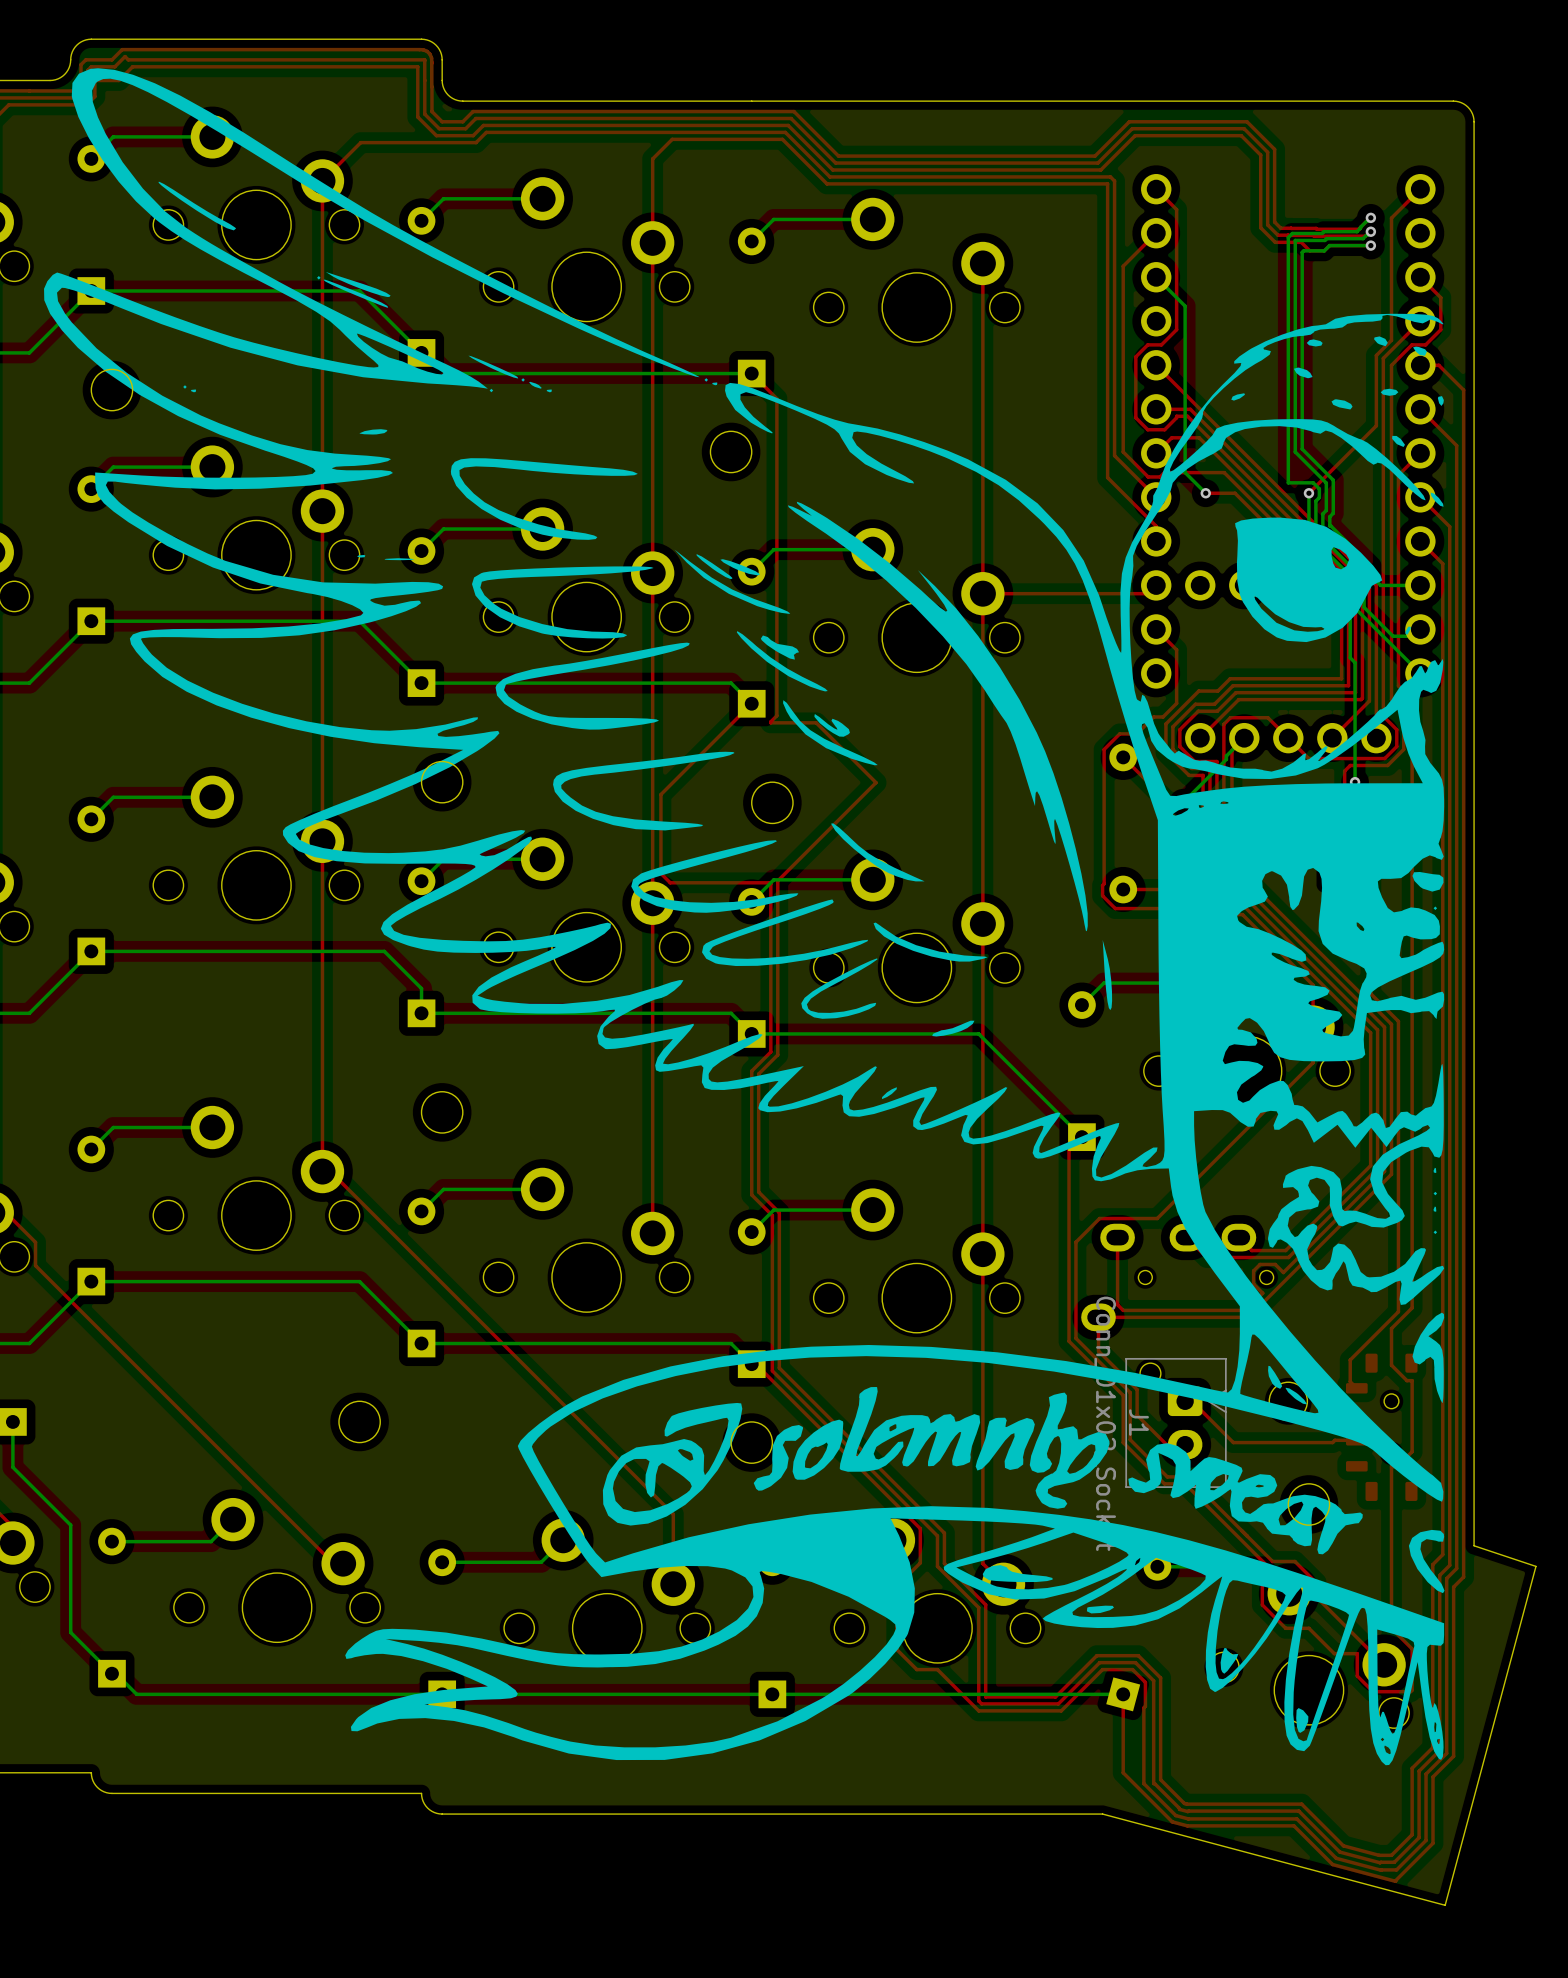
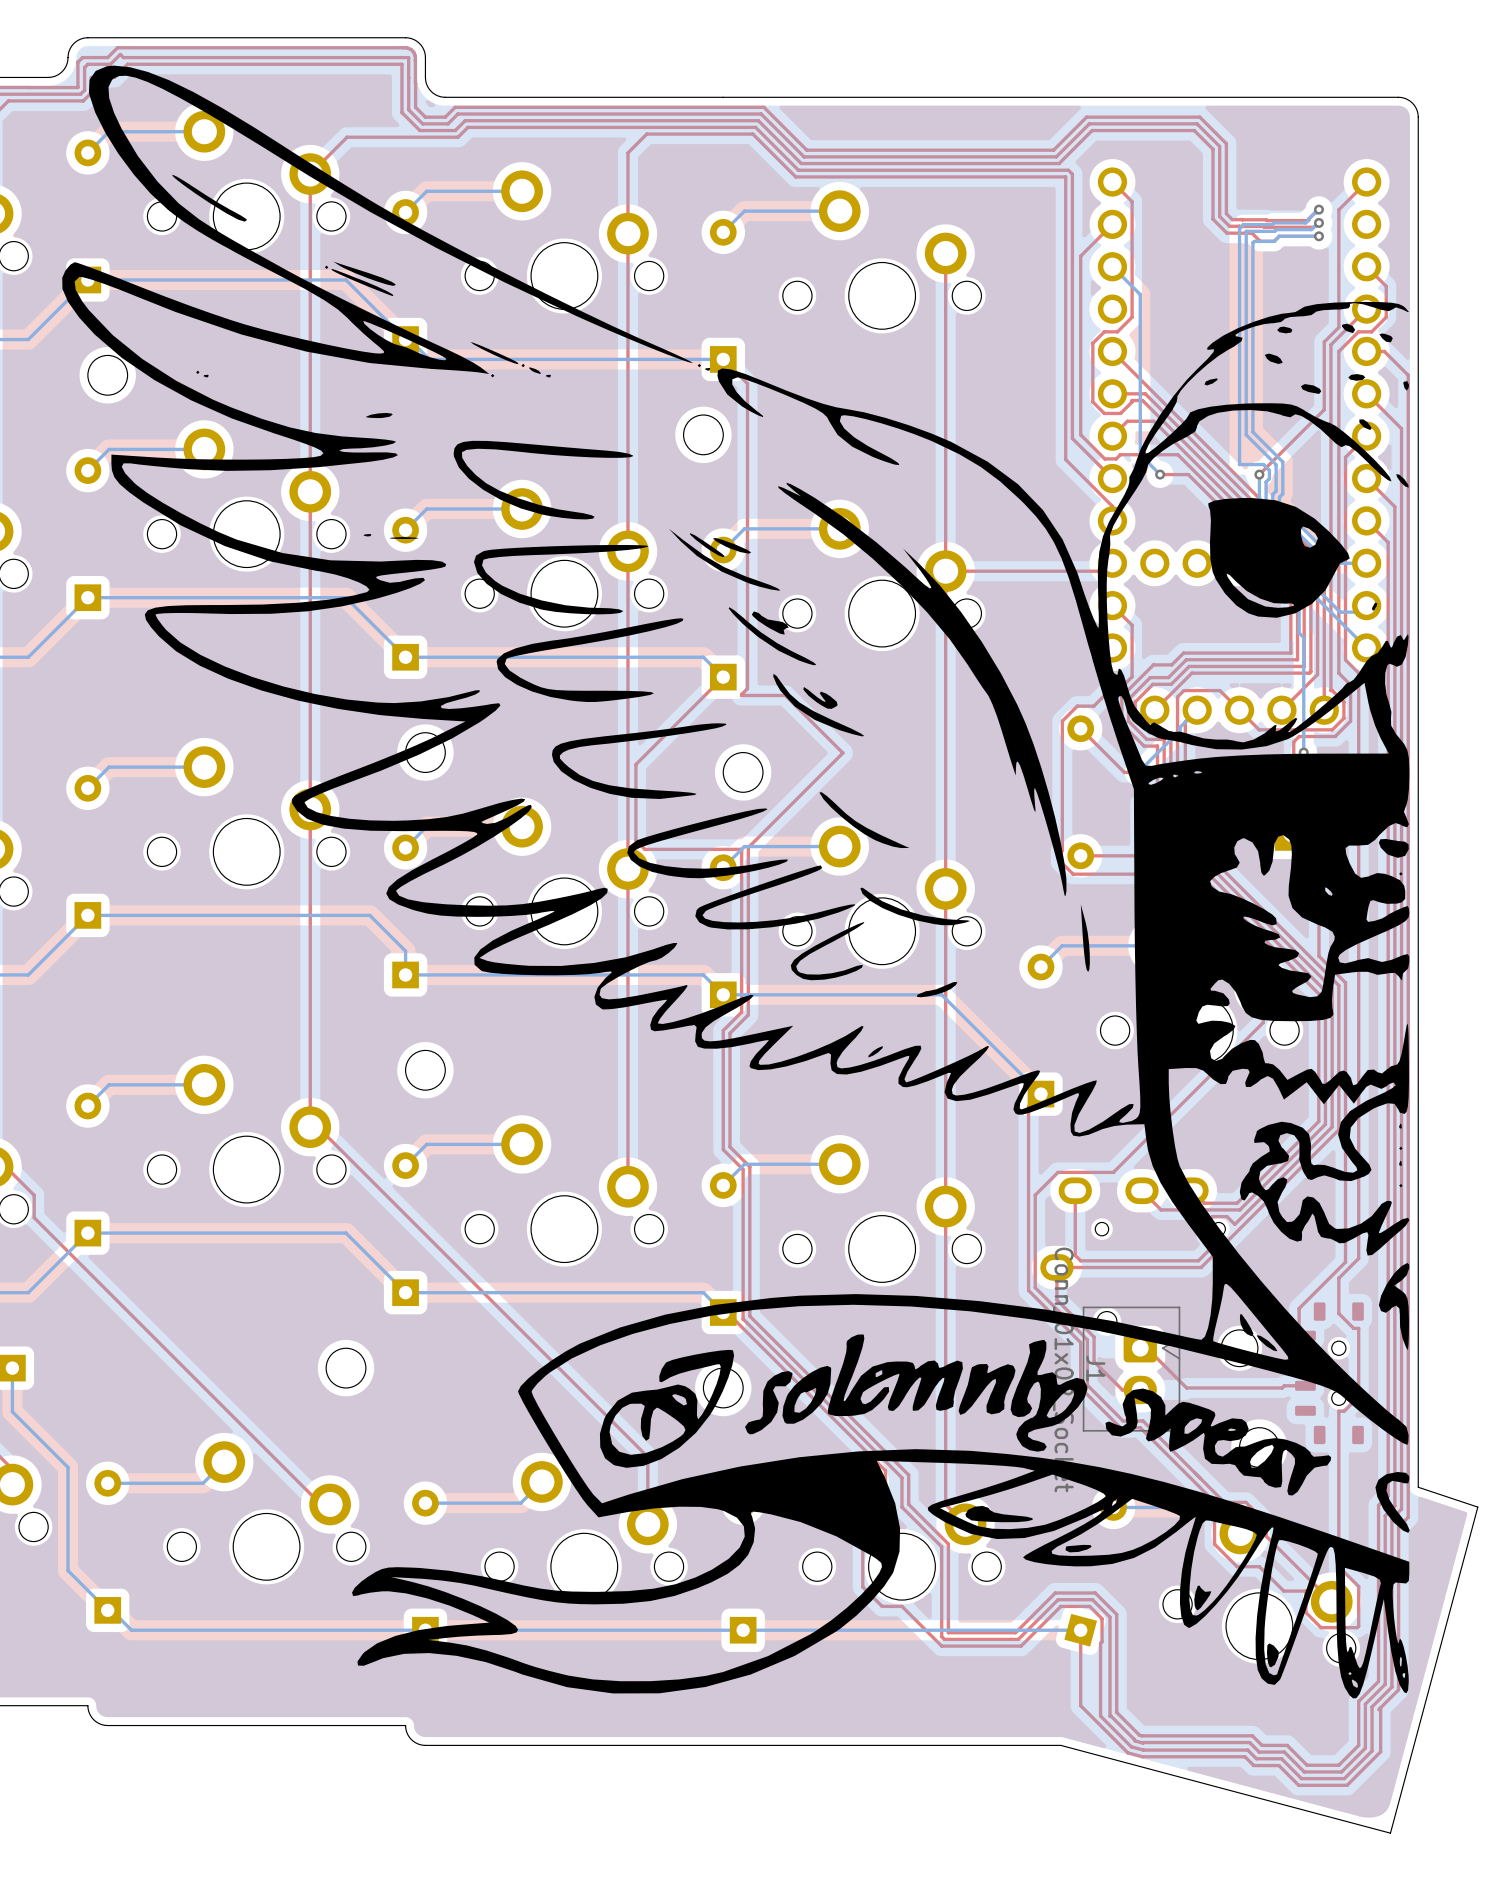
drawing position: (744, 916) -> (735, 882)
top track: (1432, 1776) (1432, 1843) (1395, 1881) (1332, 1864) (1303, 1835) -> (1380, 1707) (1380, 1751) (1347, 1785) (1298, 1785) (1278, 1765) (1253, 1765)
top track: (1301, 1804) (1343, 1845) (1379, 1855) (1391, 1855) (1412, 1834) (1412, 1814) -> (1252, 1735) (1261, 1745) (1287, 1745) (1307, 1765) (1338, 1765) (1358, 1745)
top track: (1298, 1811) (1339, 1852) (1380, 1862) (1394, 1862) (1419, 1837) (1419, 1816) -> (1249, 1742) (1259, 1752) (1284, 1752) (1304, 1771) (1341, 1771) (1365, 1748)
top track: (1426, 1819) (1426, 1840) (1396, 1869) (1381, 1870) (1336, 1858) (1305, 1827) -> (1372, 1750) (1344, 1778) (1301, 1778) (1281, 1758) (1256, 1758)

